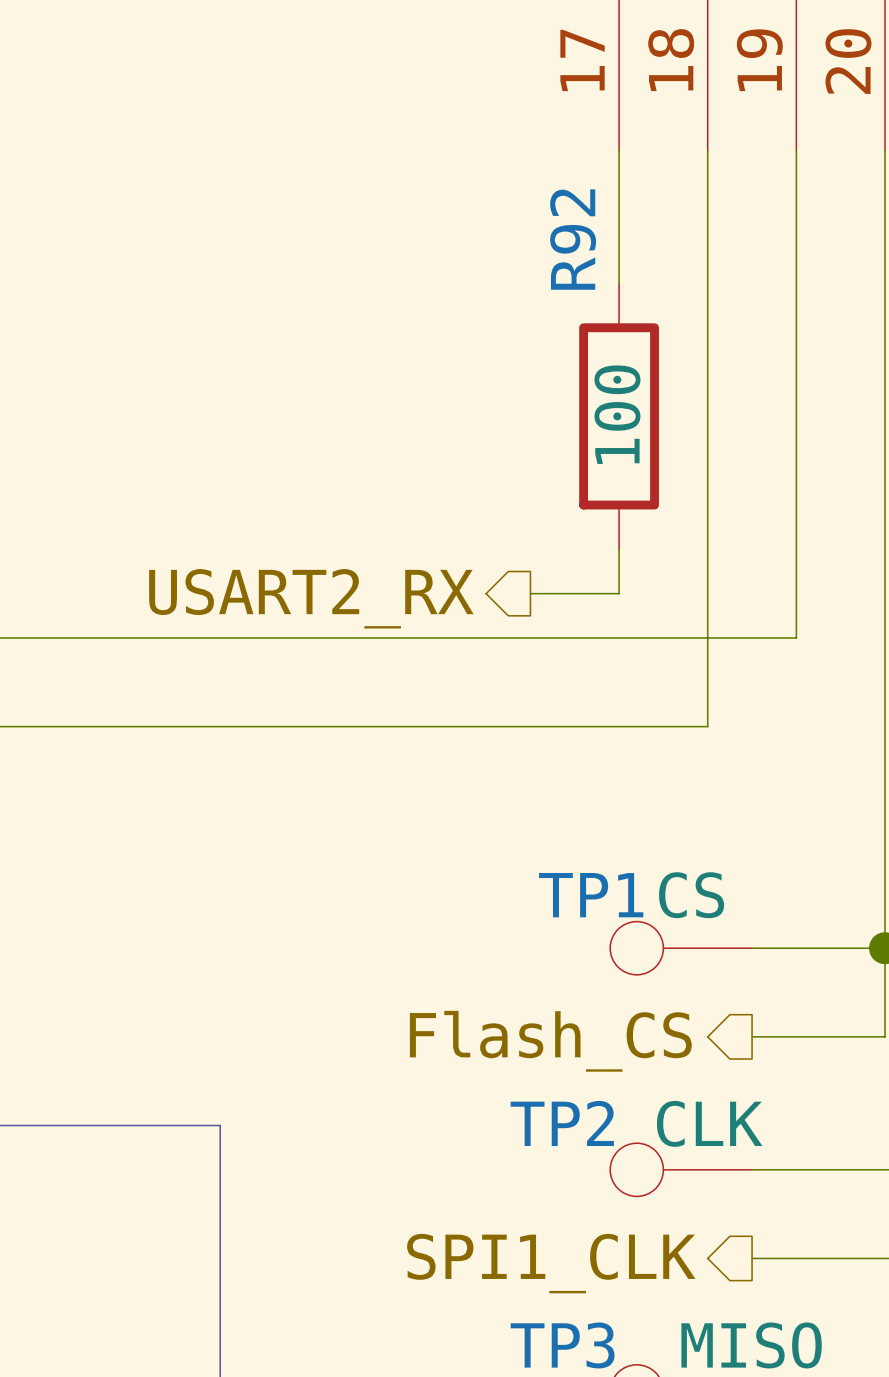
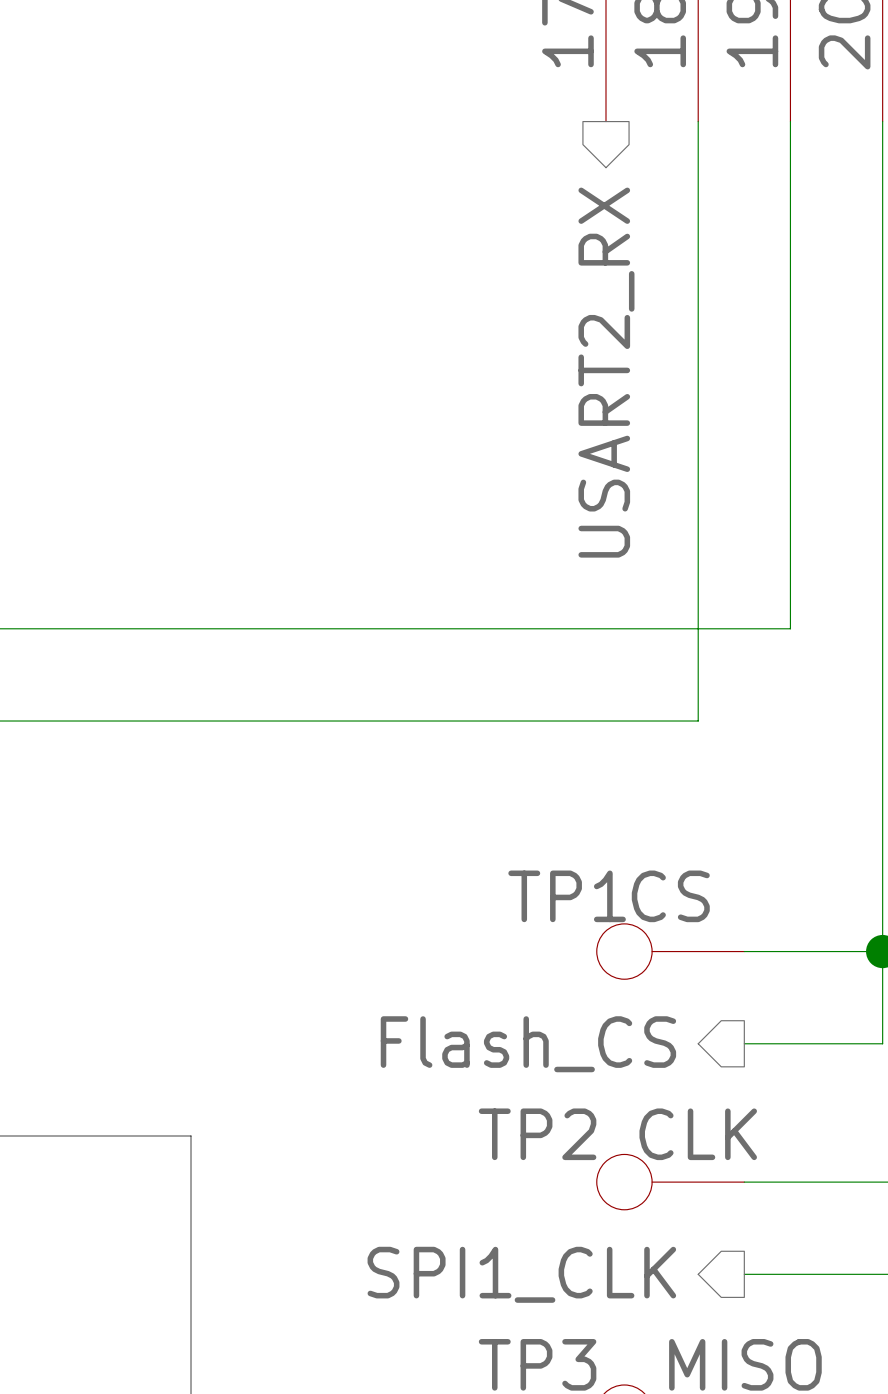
wire: (619, 150) (619, 283) -> none
R92: 100 (619, 416) -> none
wire: (619, 549) (619, 593) (530, 593) -> none
hierarchical label rotation: 0° (311, 598) -> 90° counterclockwise (606, 372)

